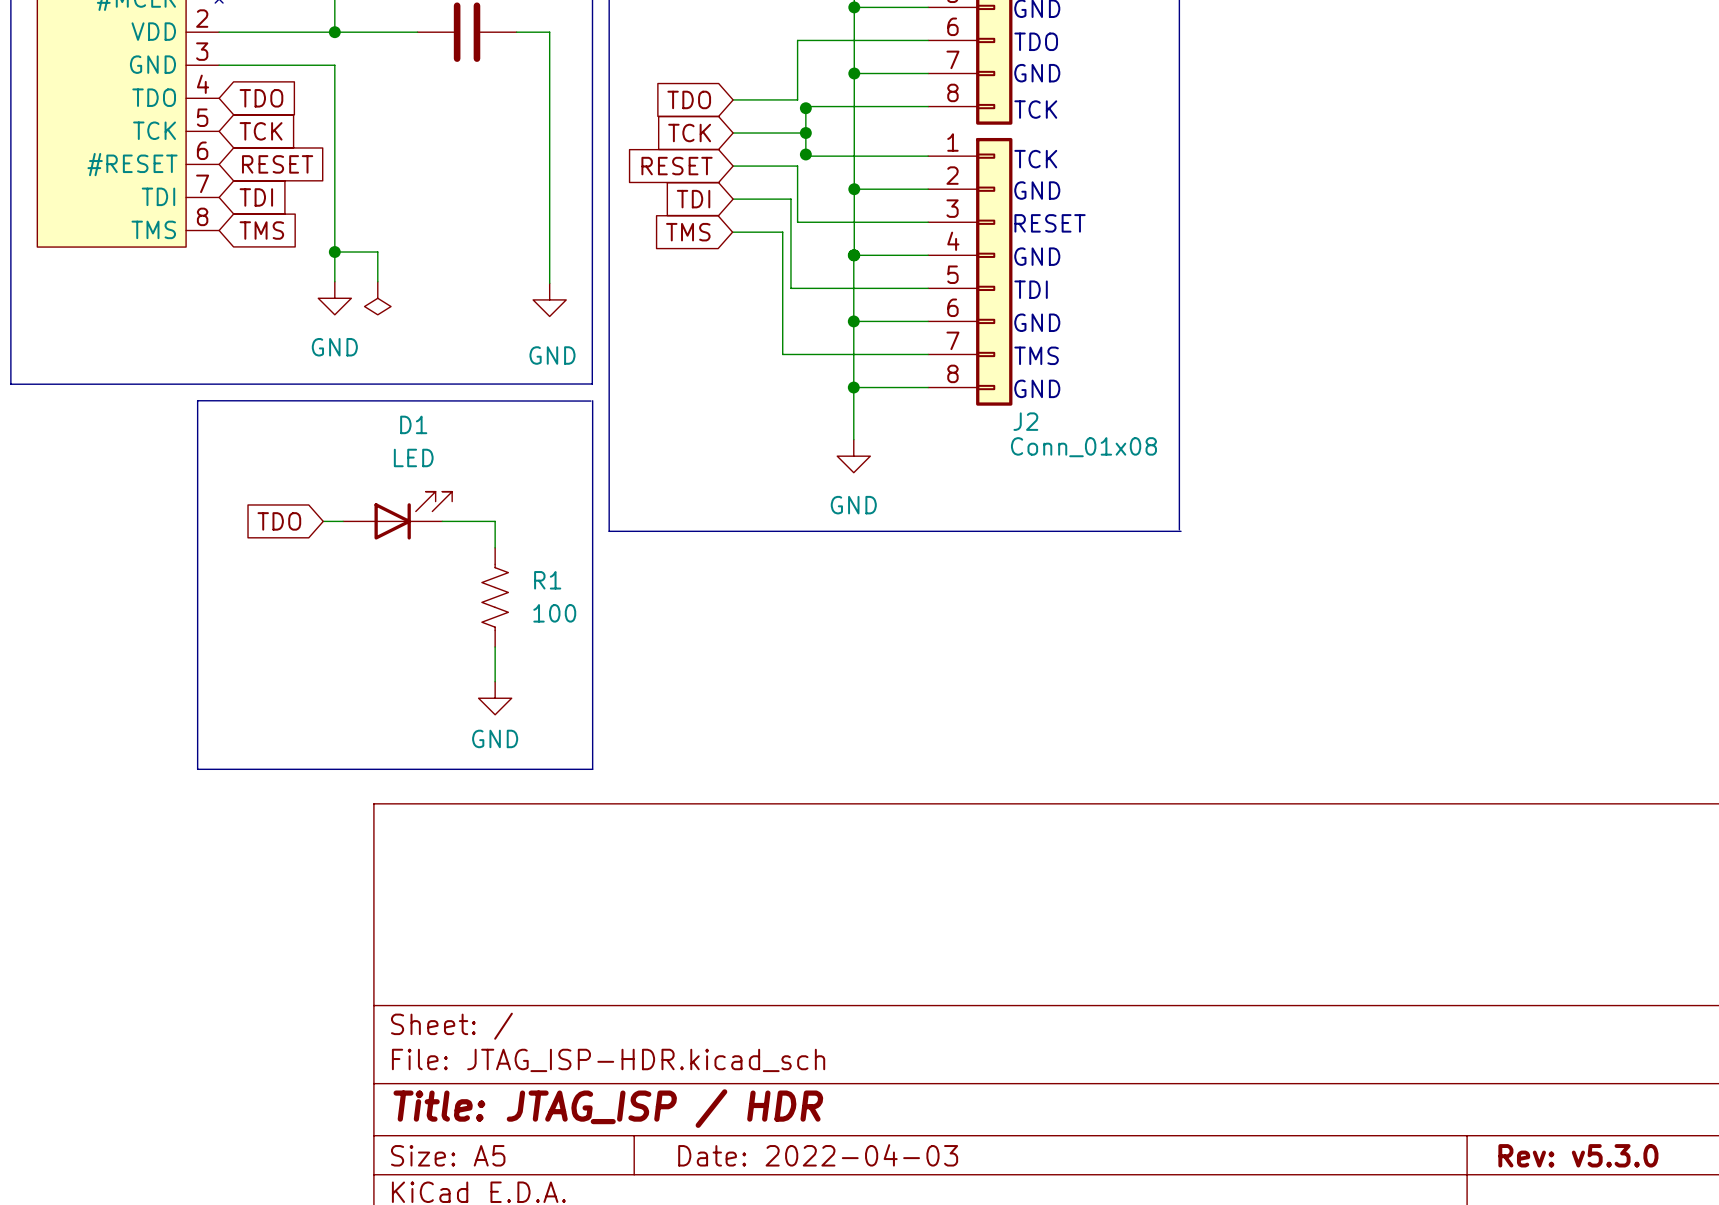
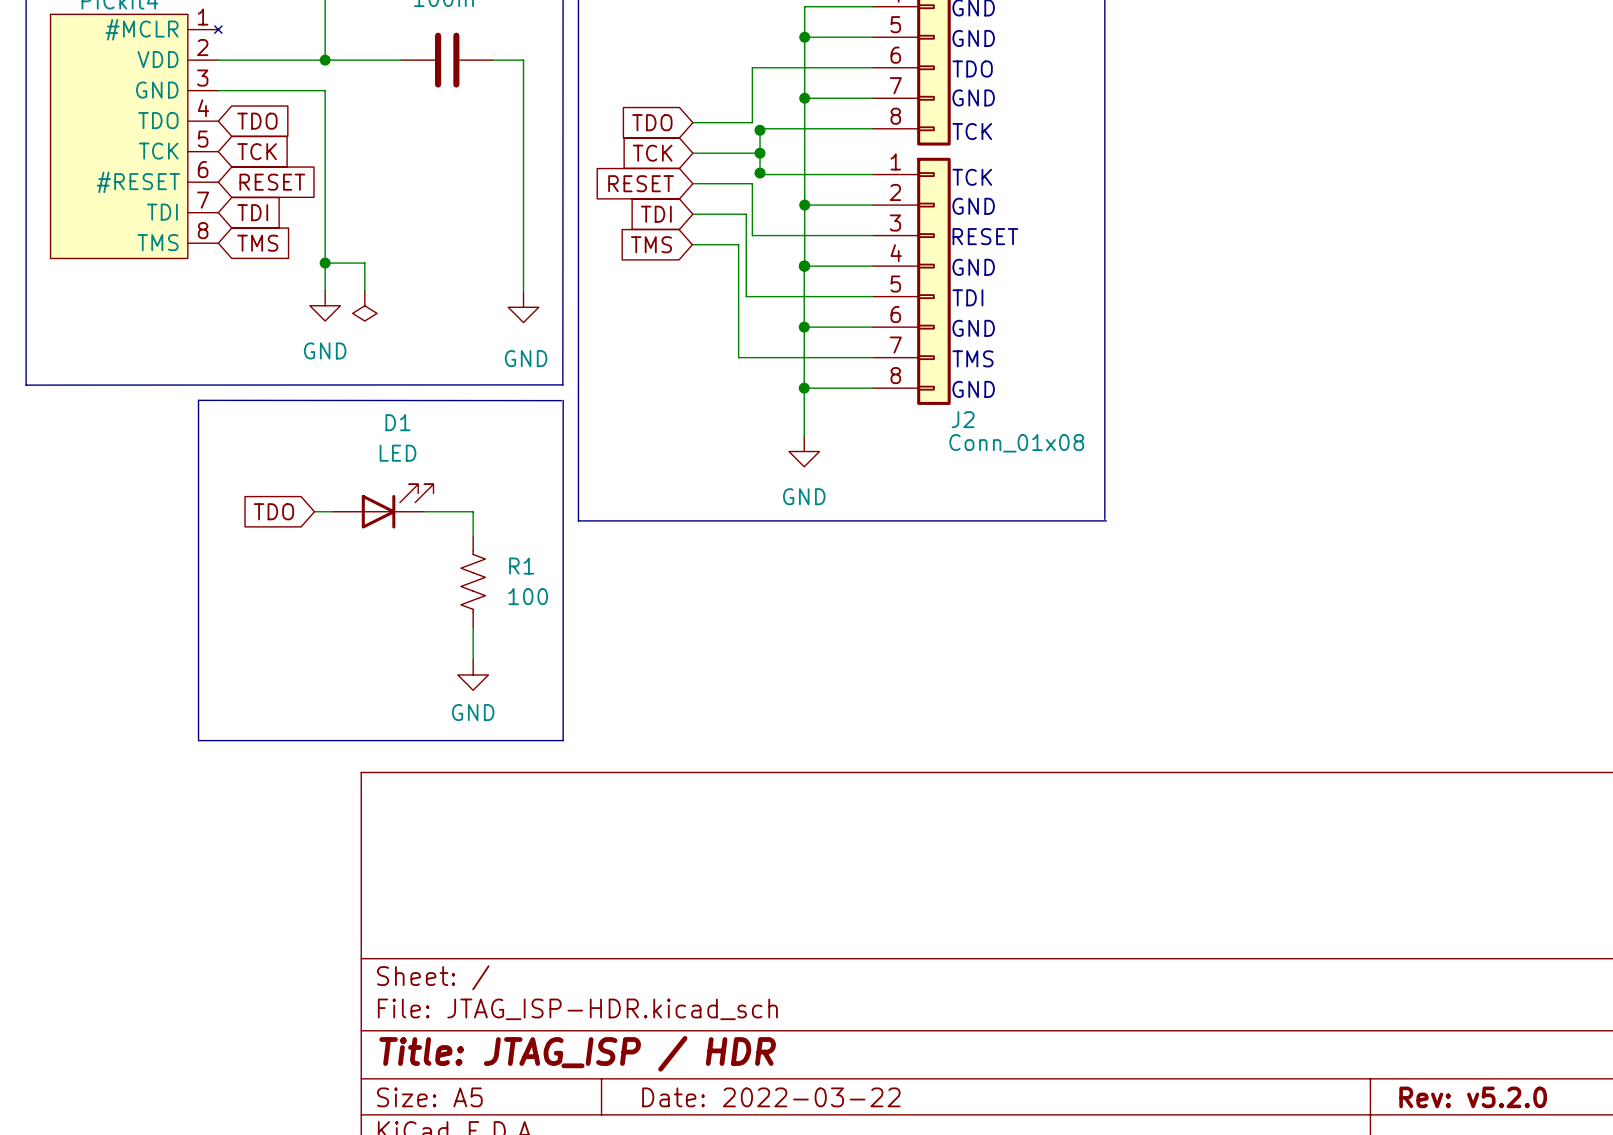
title block: Date: 2022-04-03 (818, 1155) -> Date: 2022-03-22 (771, 1097)
title block: Rev: v5.3.0 (1578, 1155) -> Rev: v5.2.0 (1473, 1097)

